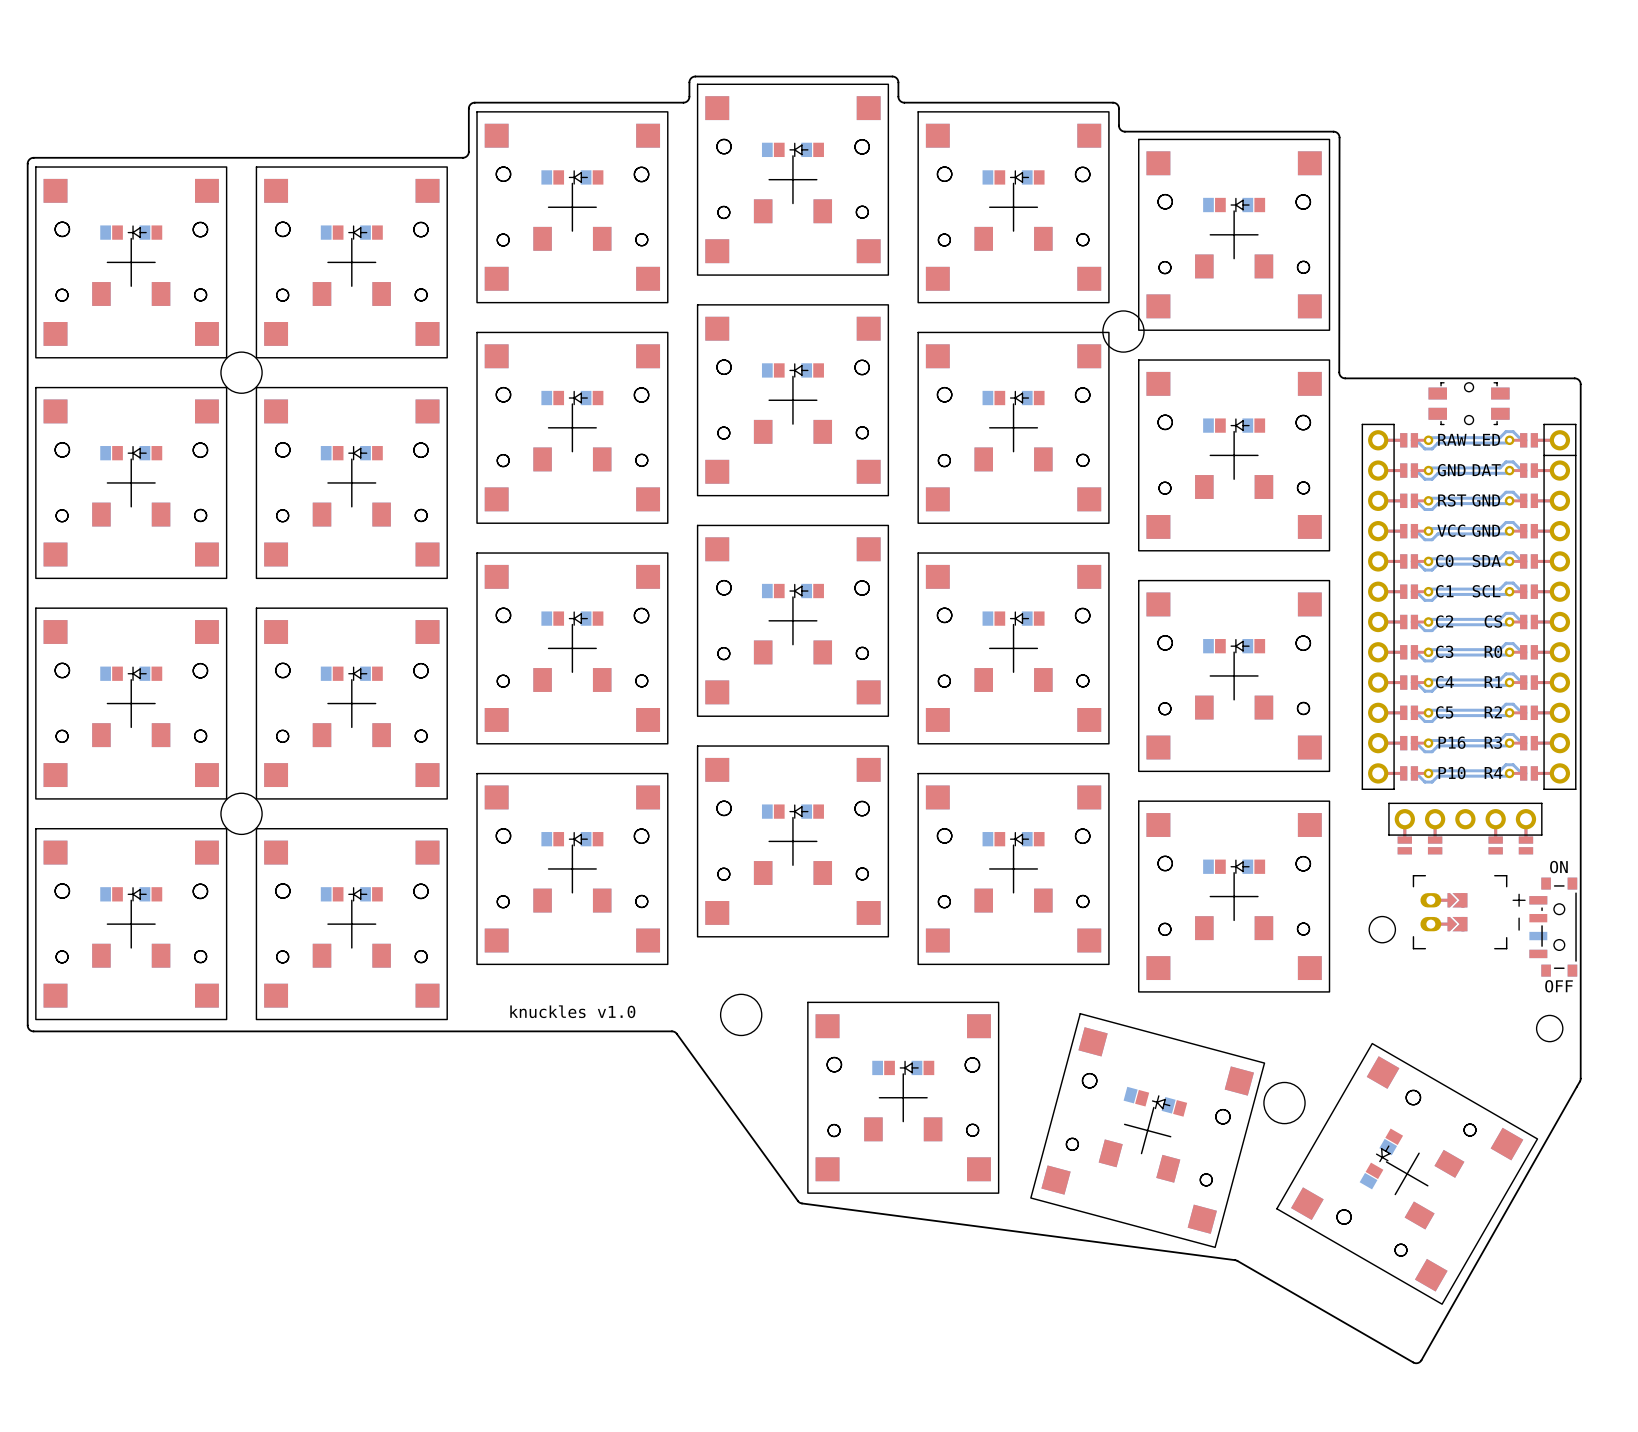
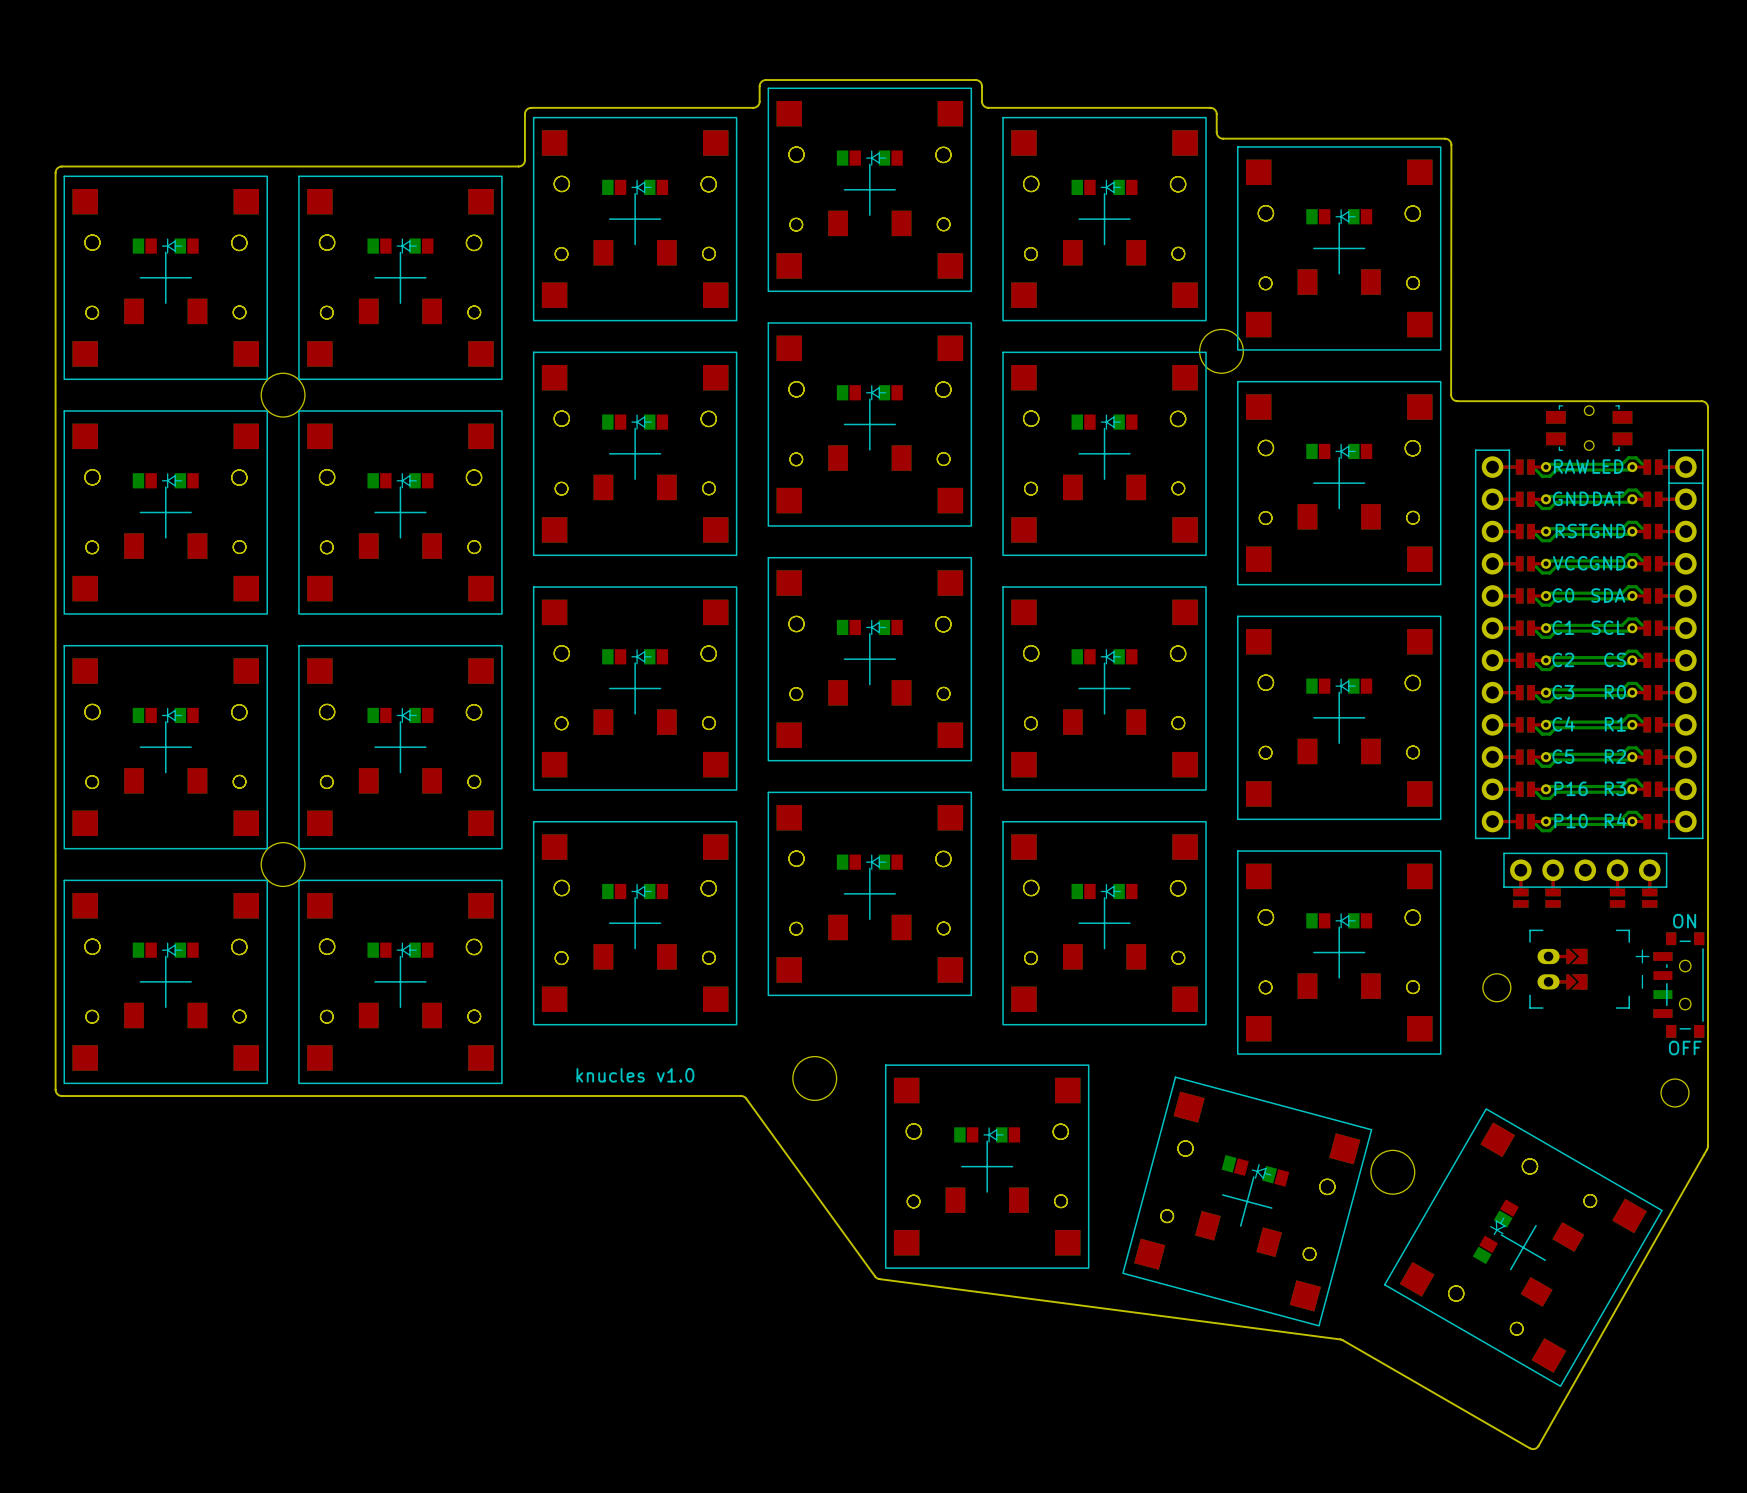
text: knuckles v1.0 (572, 1011) -> knucles v1.0 (635, 1075)

